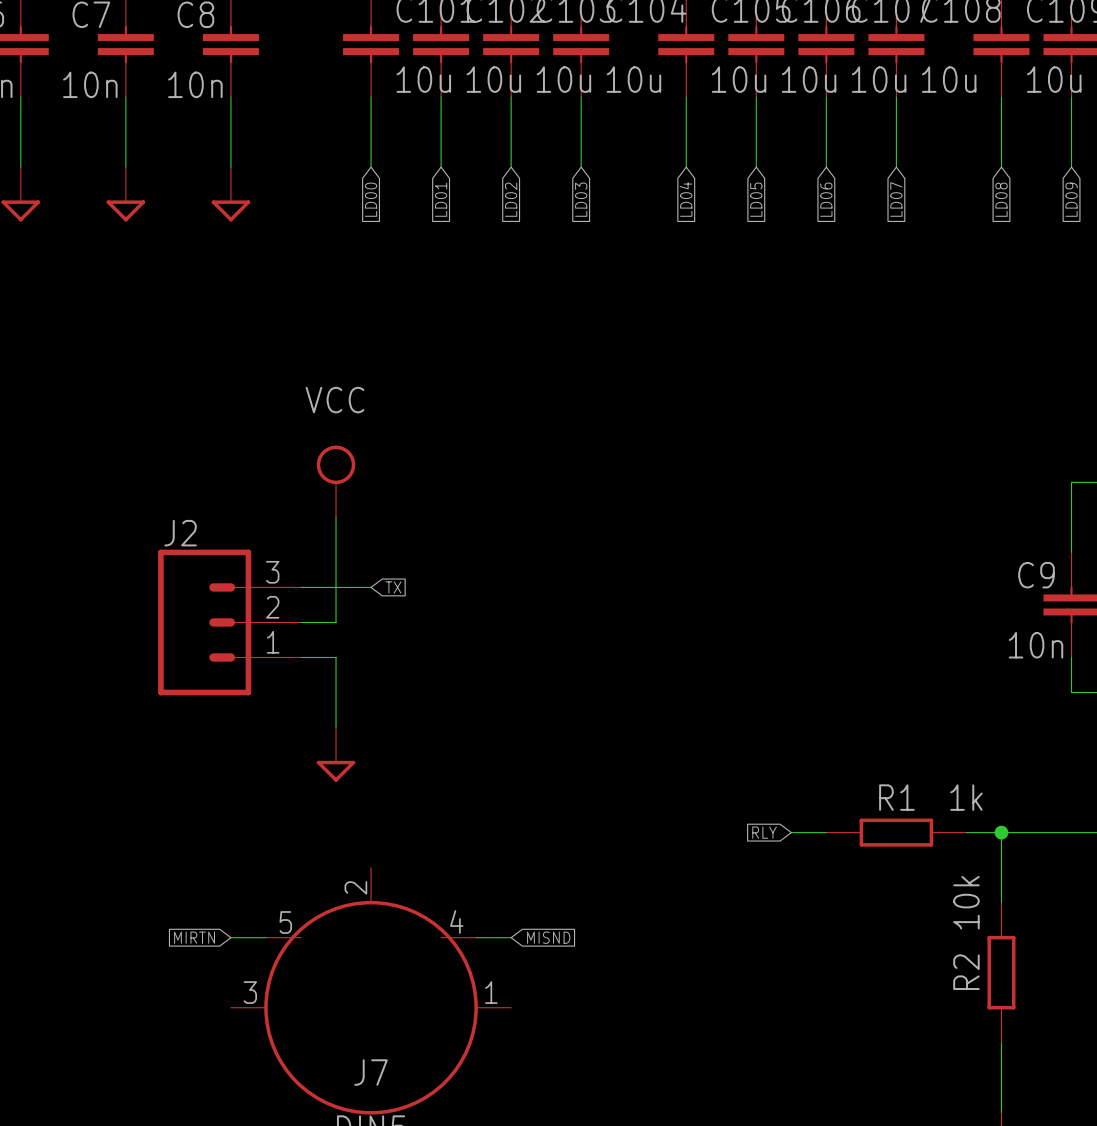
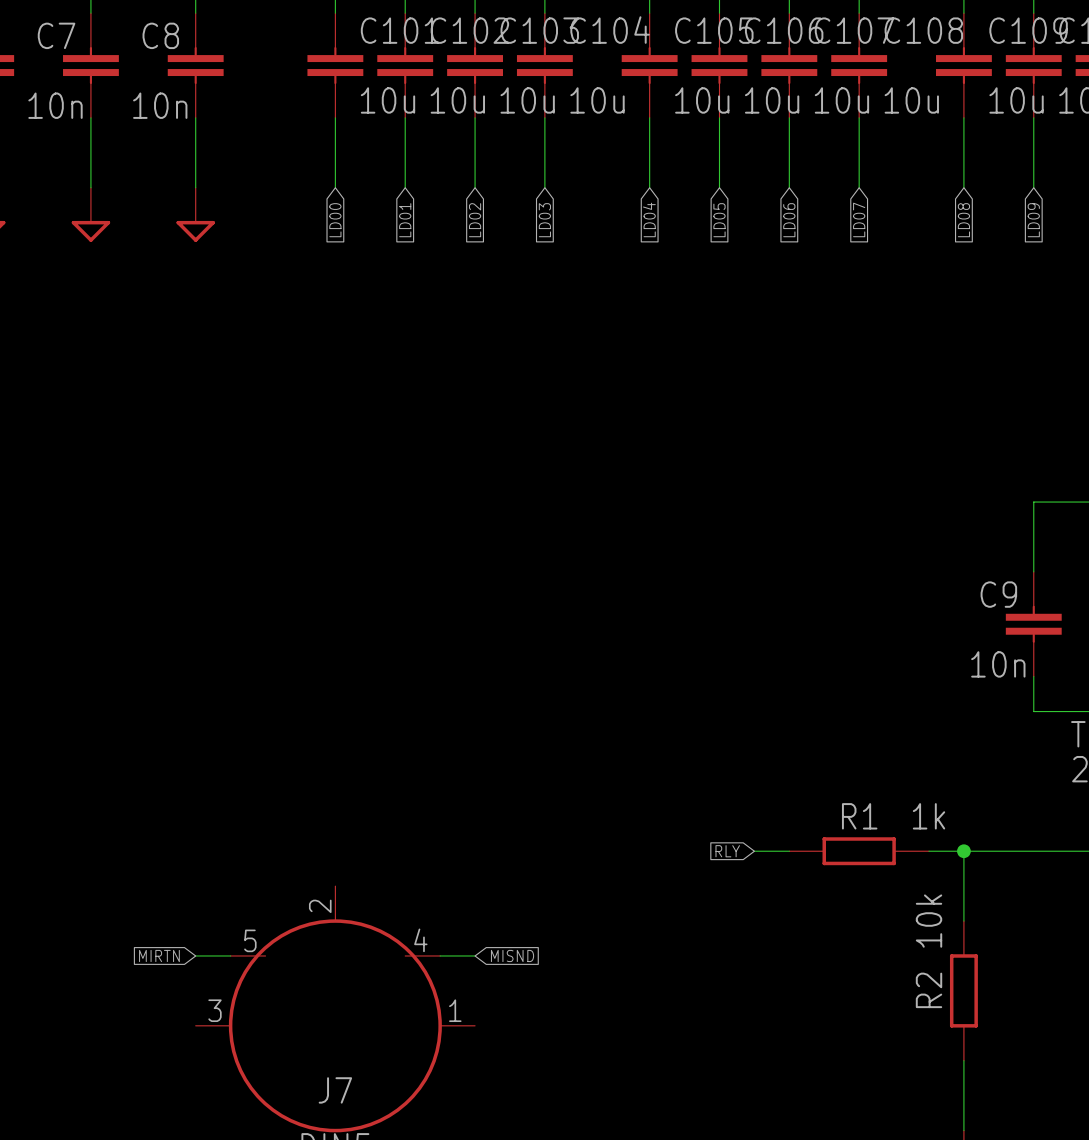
power symbol: VCC (336, 481) -> none
wire: (336, 517) (336, 622) (300, 622) -> none
wire: (300, 587) (371, 587) -> none
global label: TX (393, 587) -> none
J2: (229, 622) -> none
wire: (300, 657) (336, 657) (336, 727) -> none
power symbol: (336, 754) -> none

